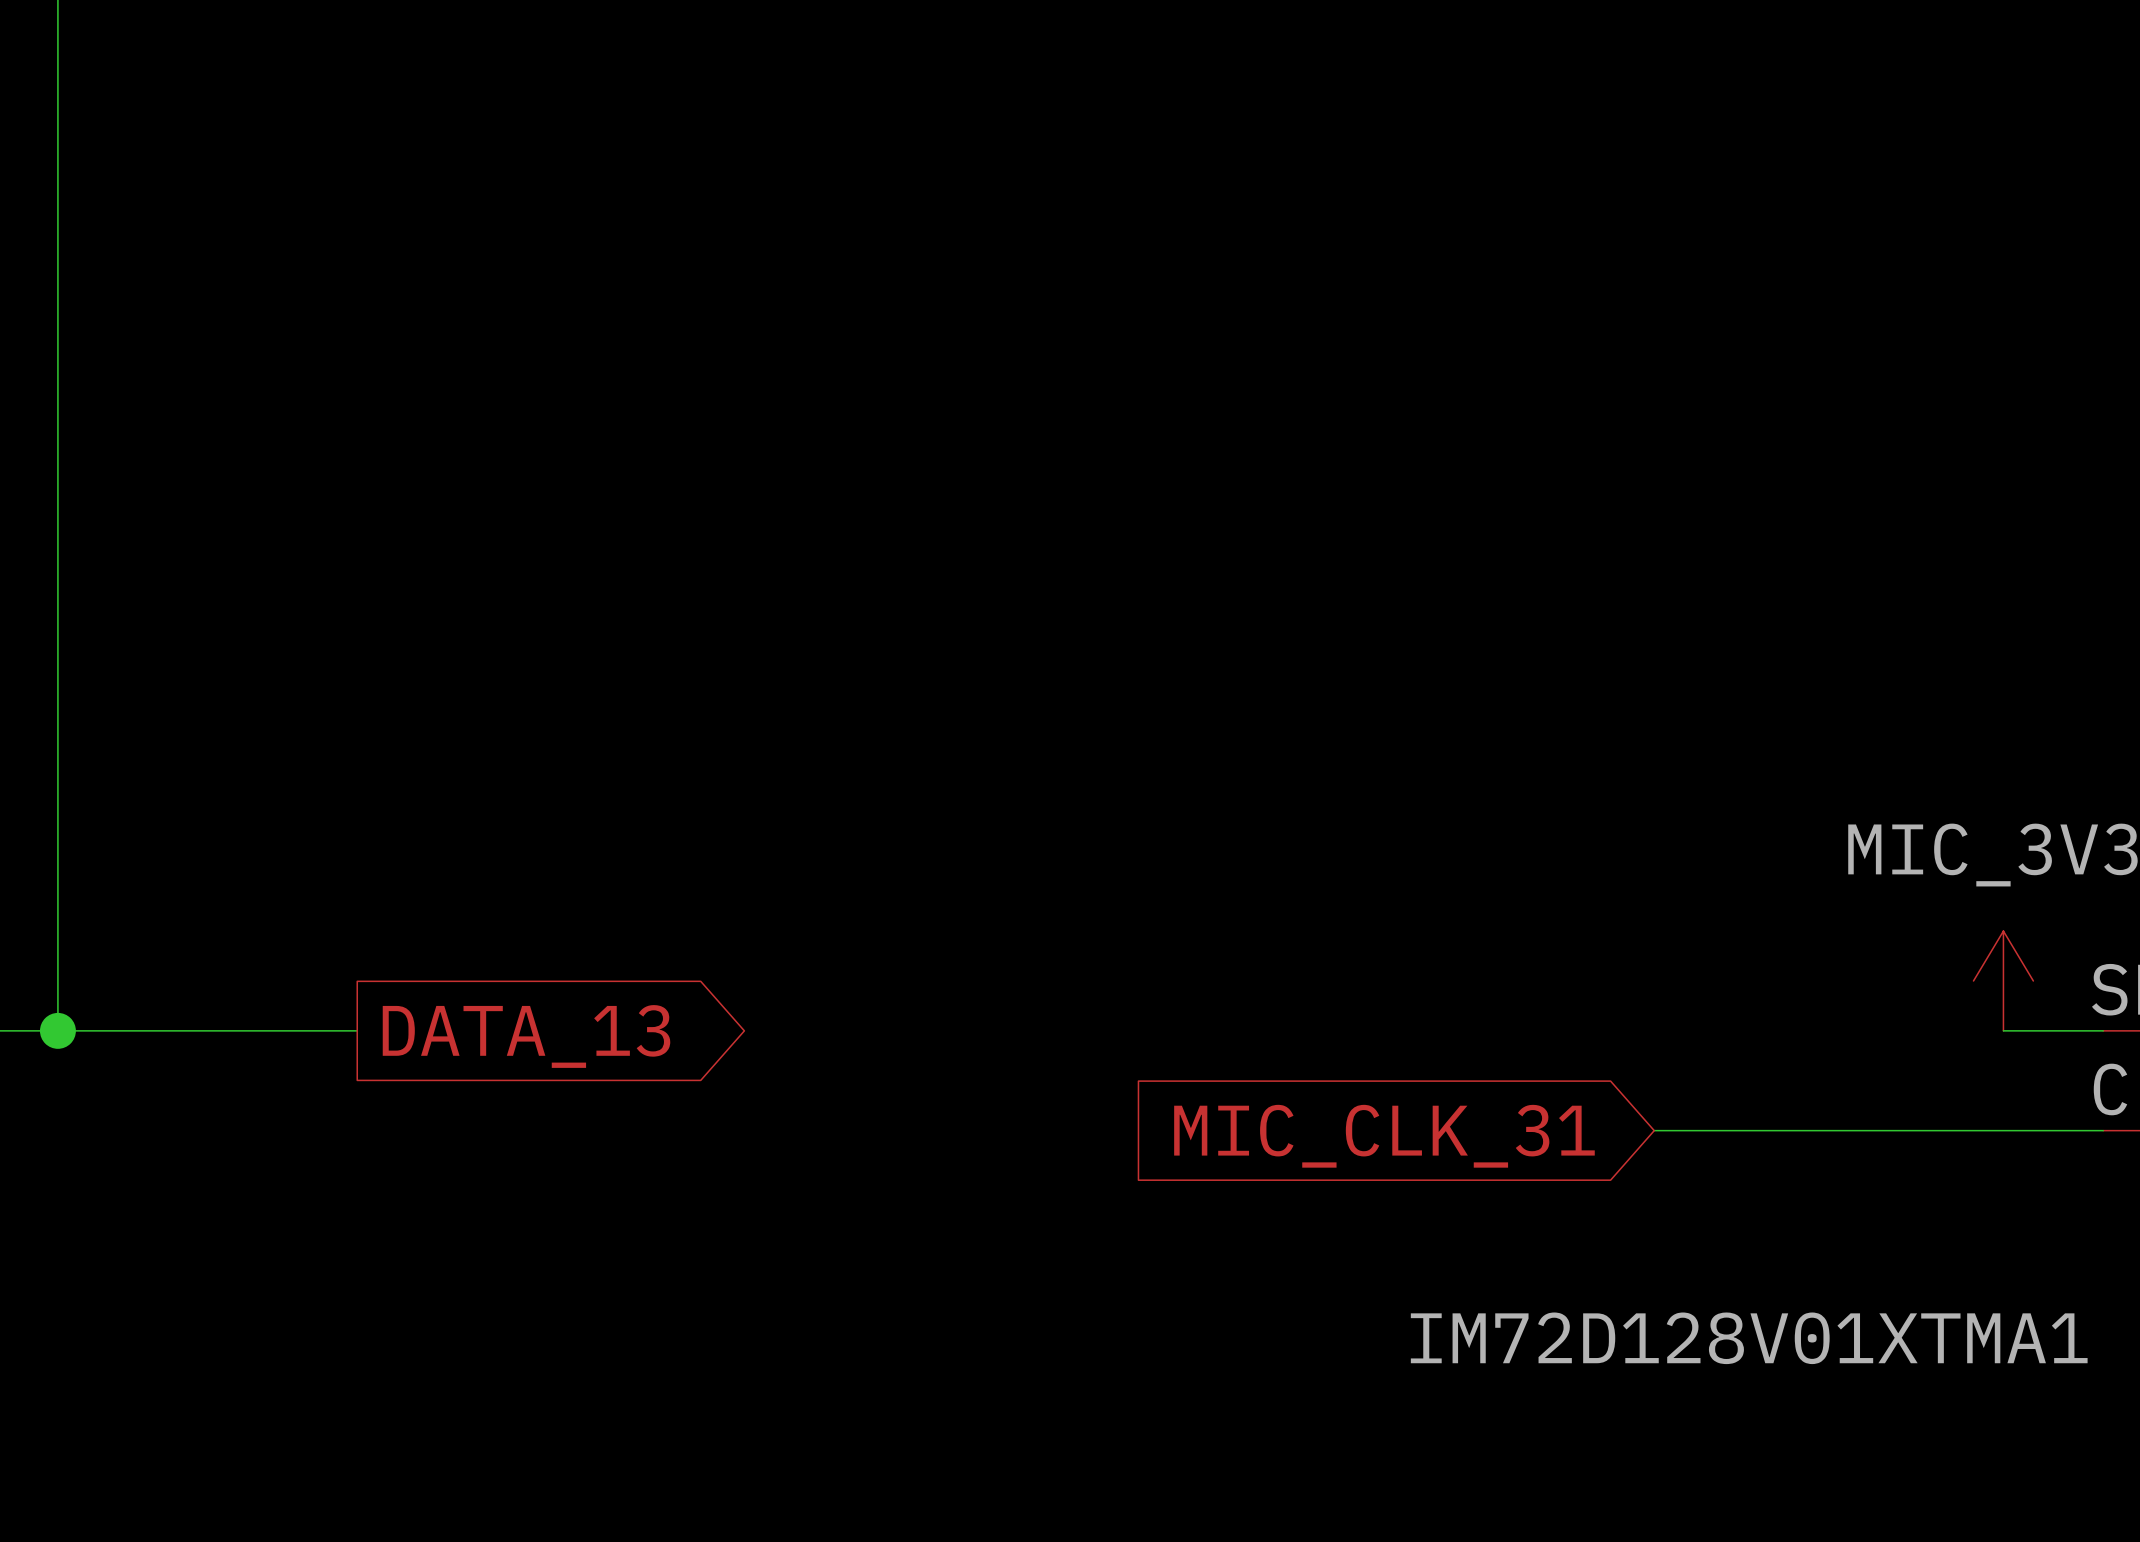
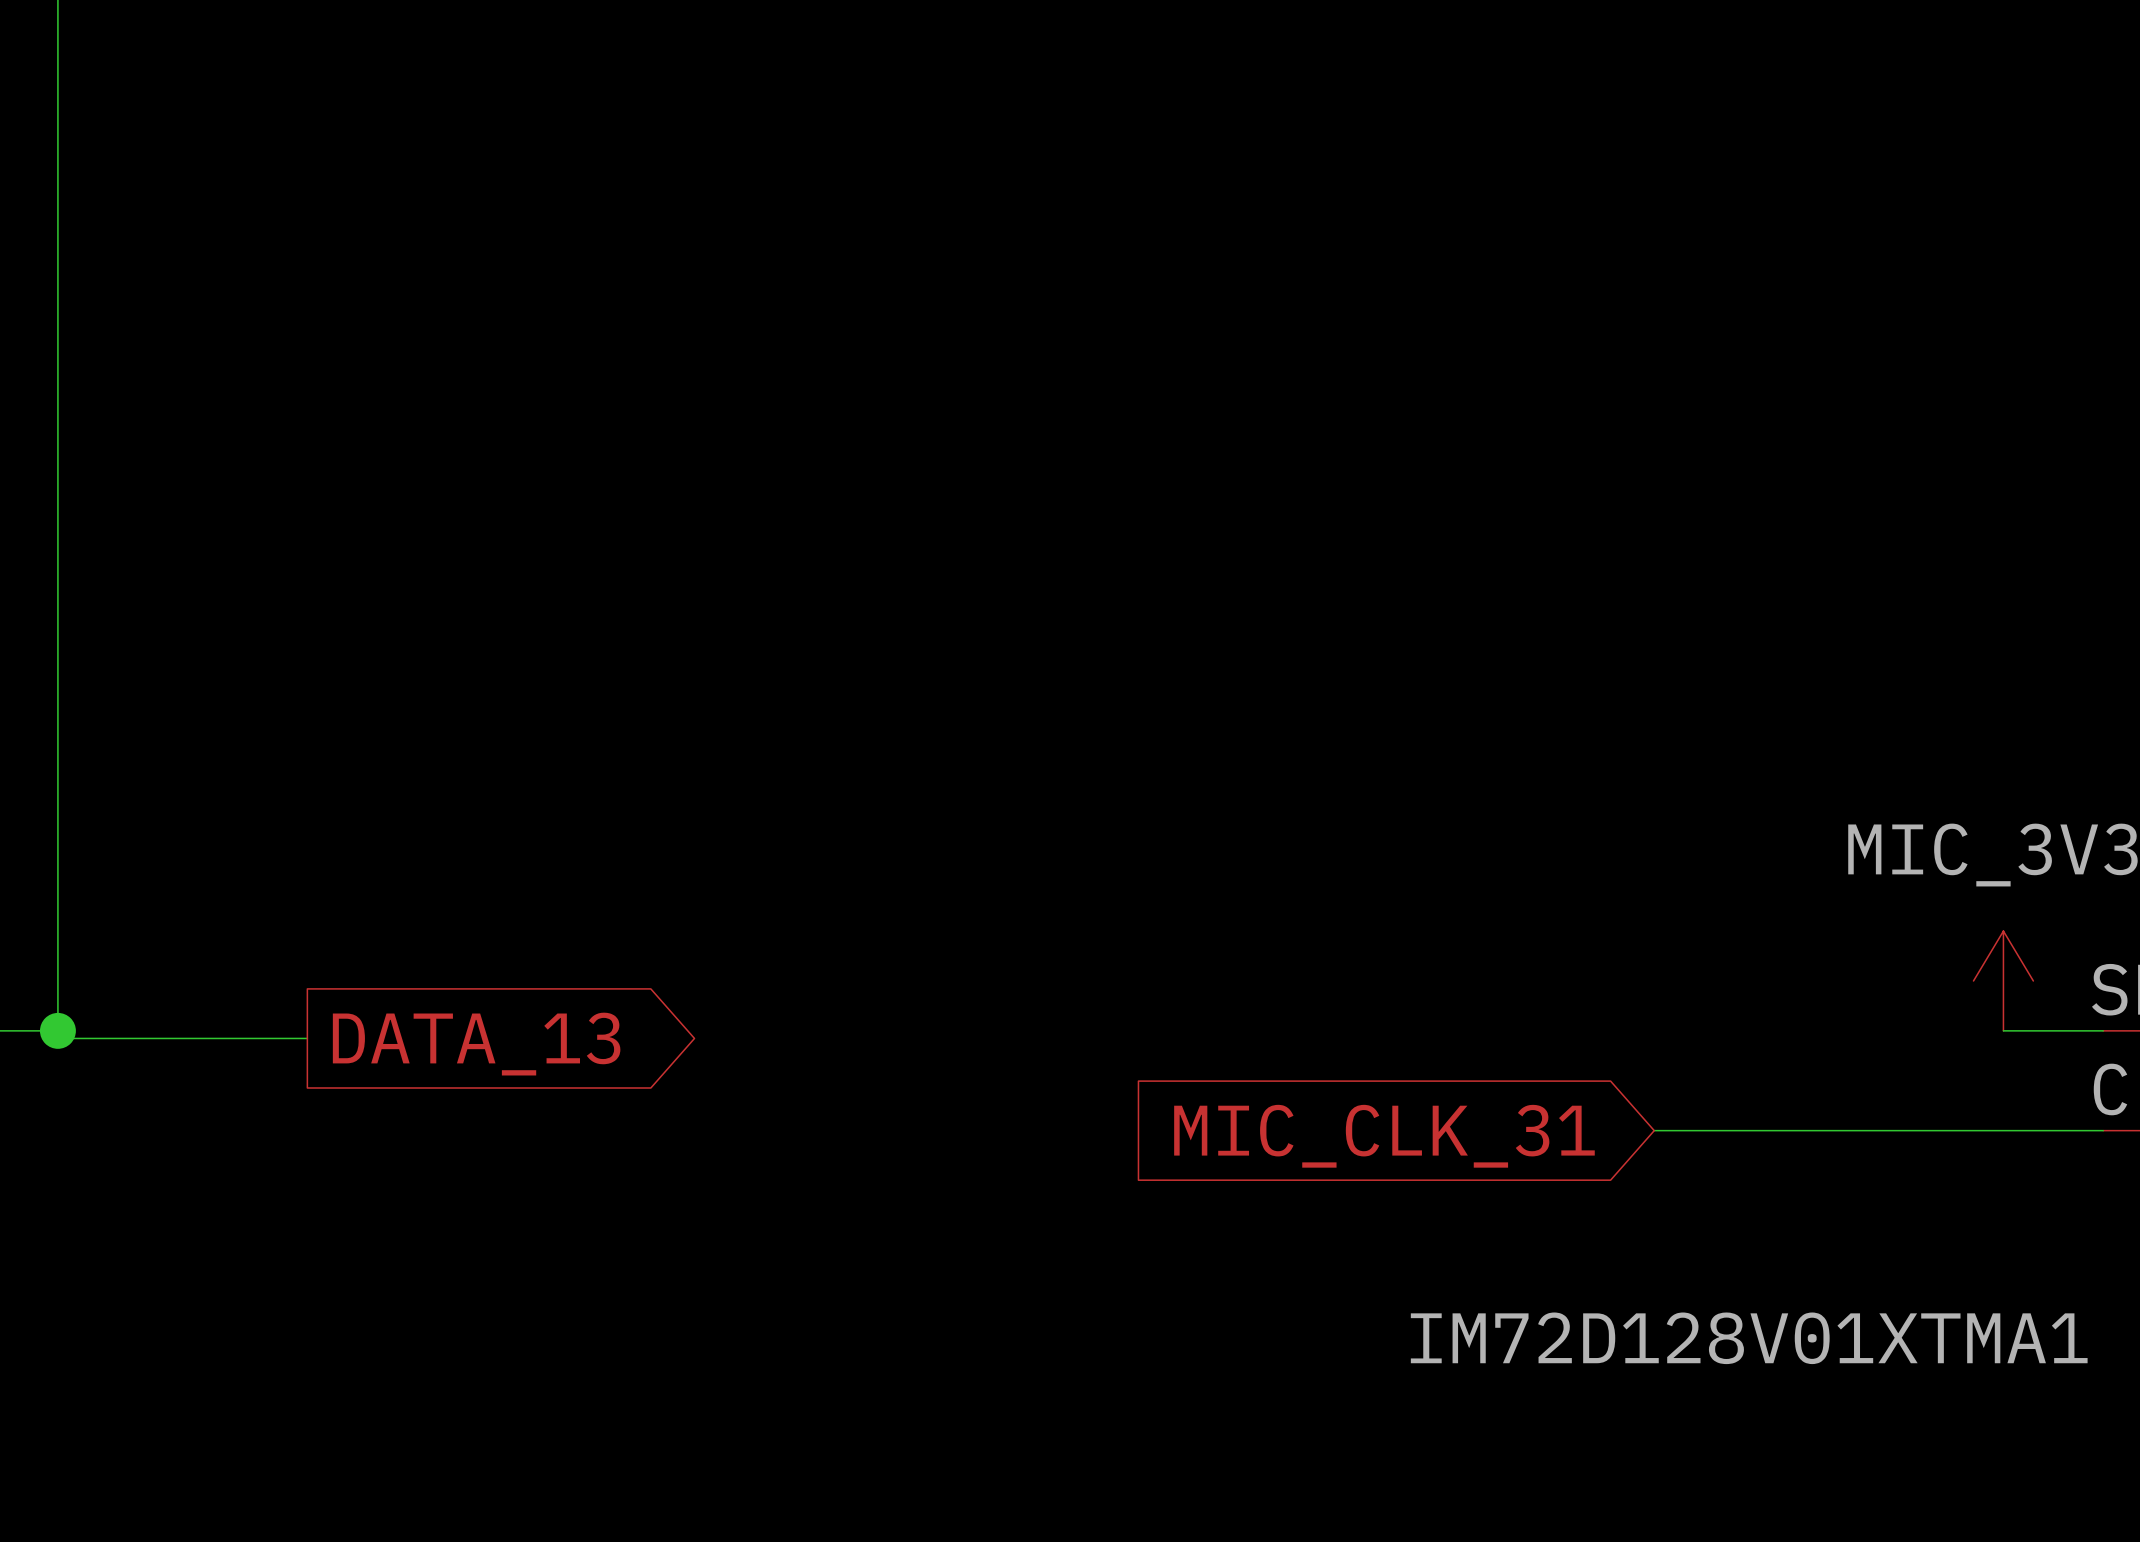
wire: (57, 1030) (357, 1030) -> (57, 1030) (57, 1038) (307, 1038)
global label position: DATA_13 (526, 1036) -> DATA_13 (476, 1044)

